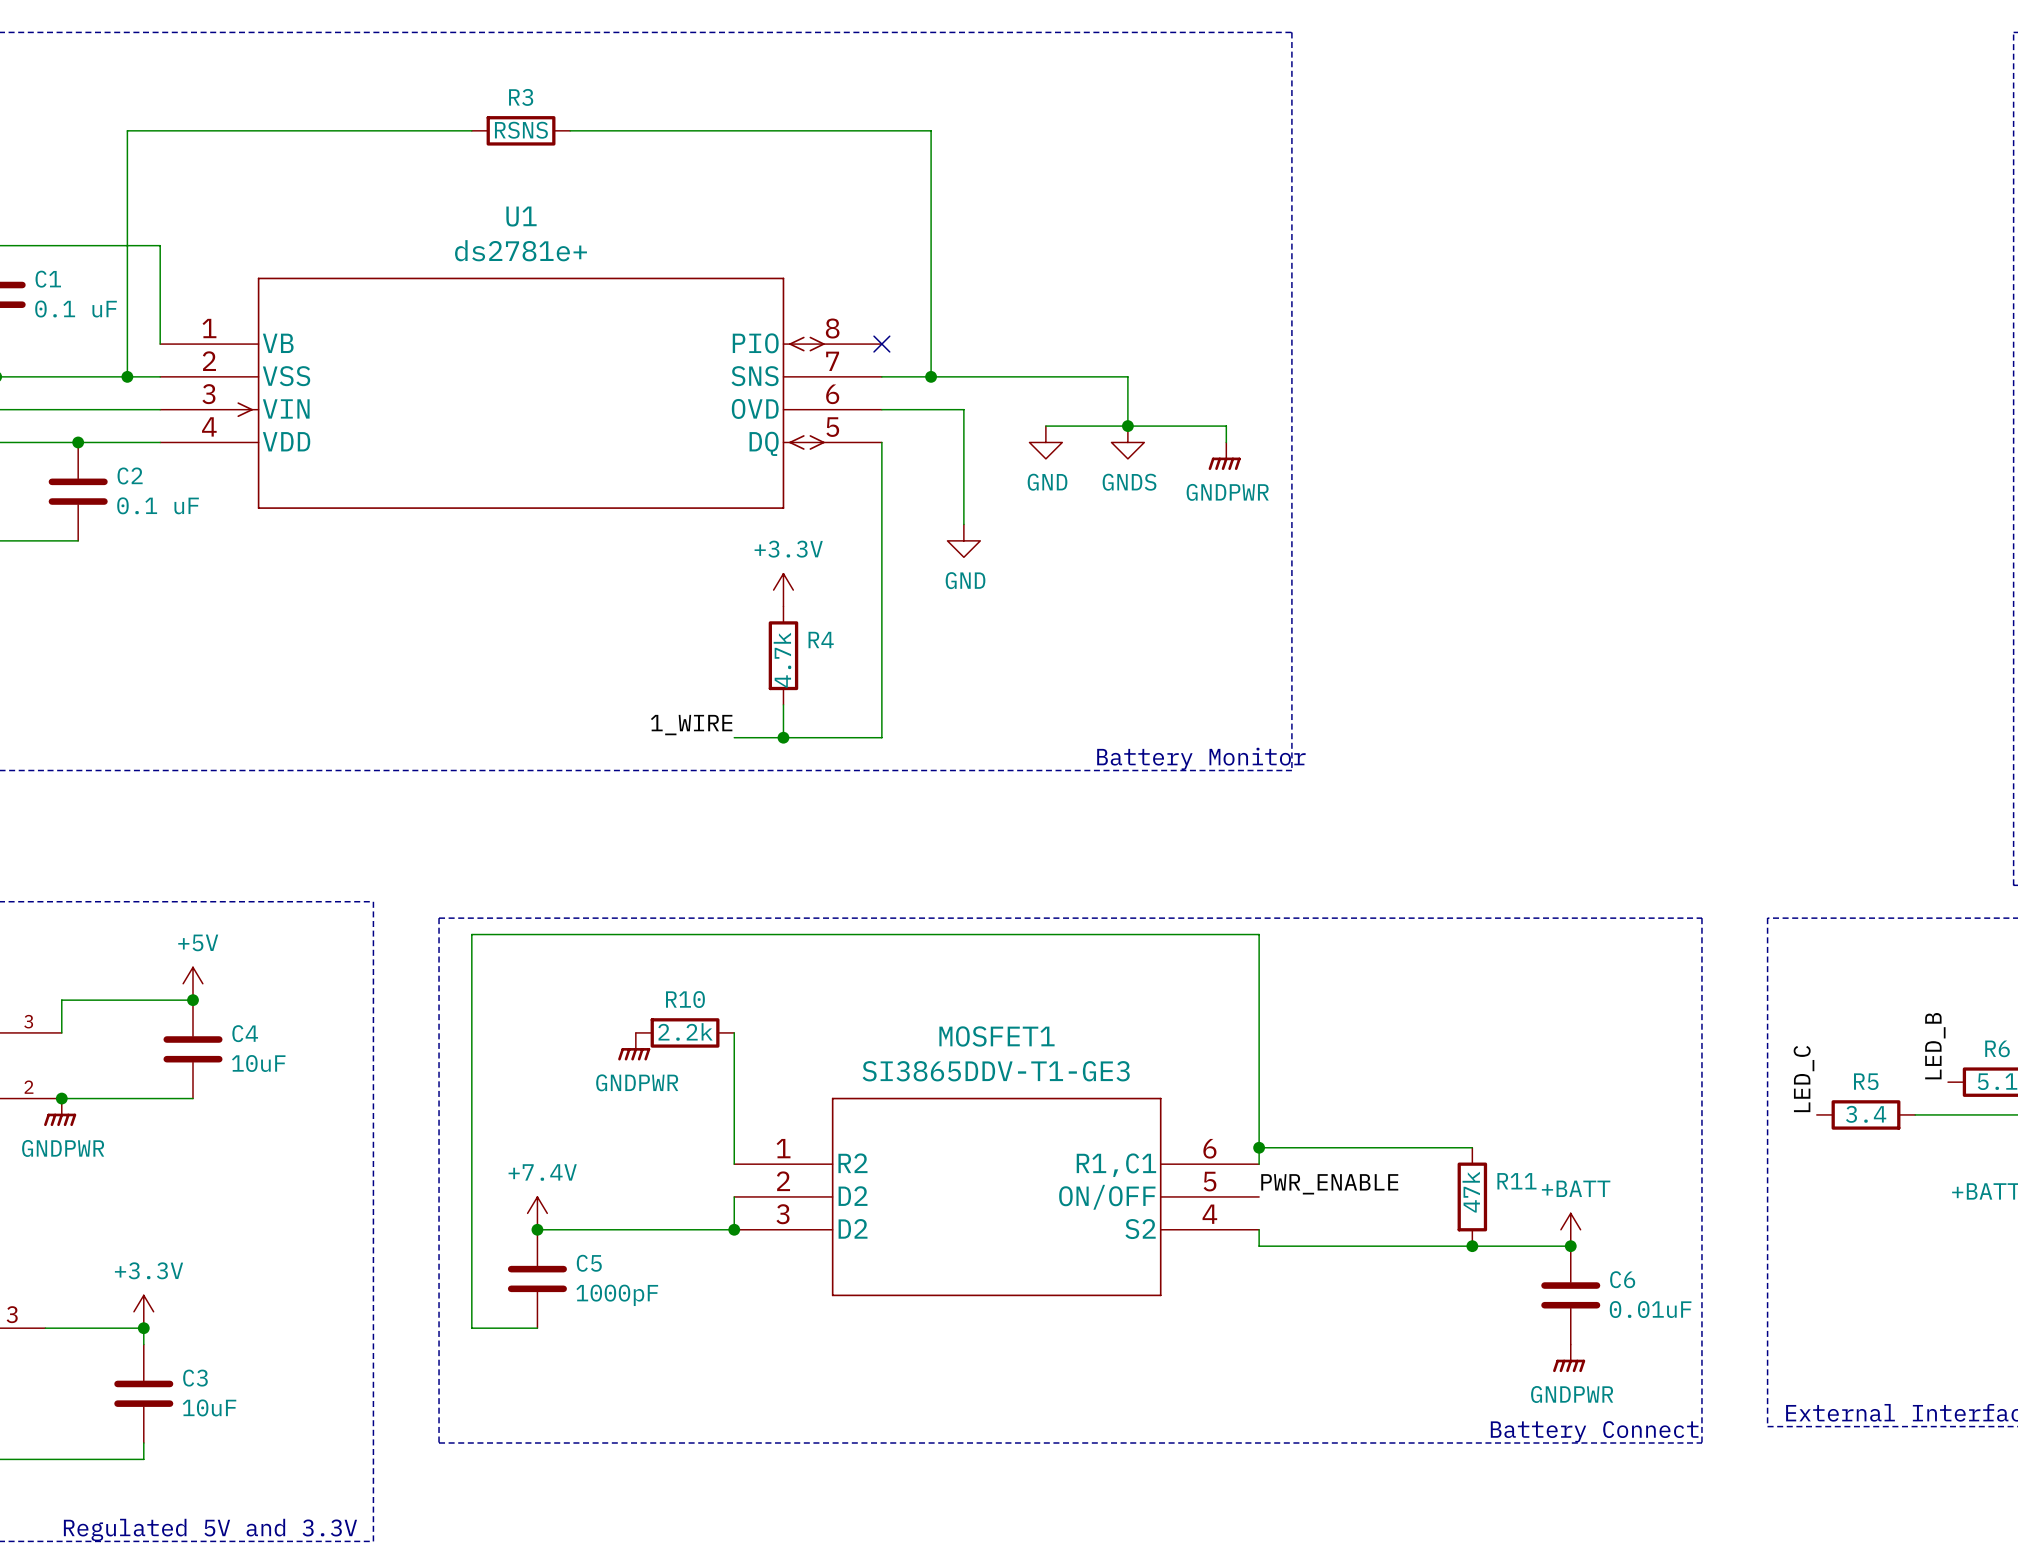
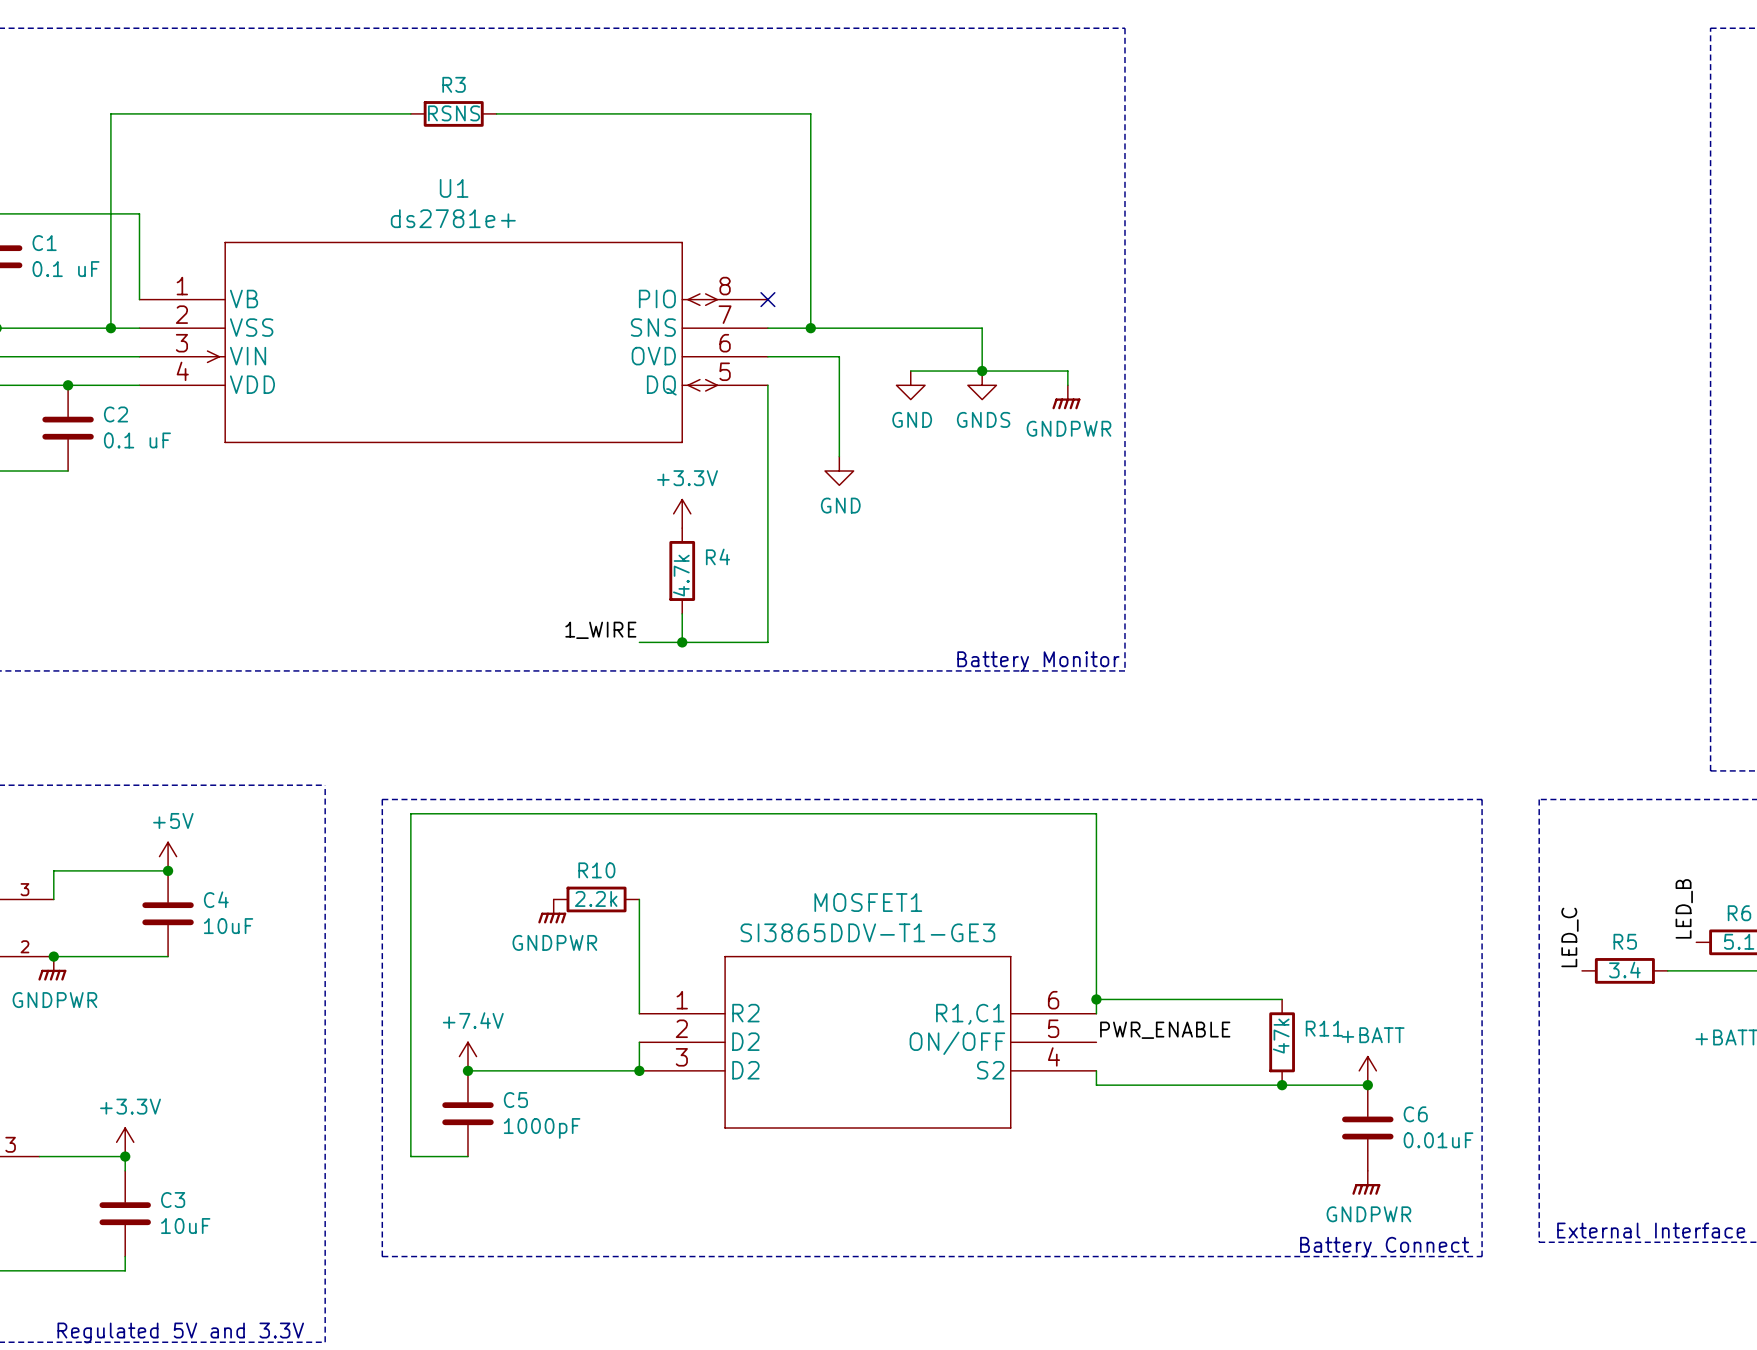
line: (2013, 32) (2013, 885) -> (1753, 28) (1710, 28) (1710, 770) (1753, 770)

